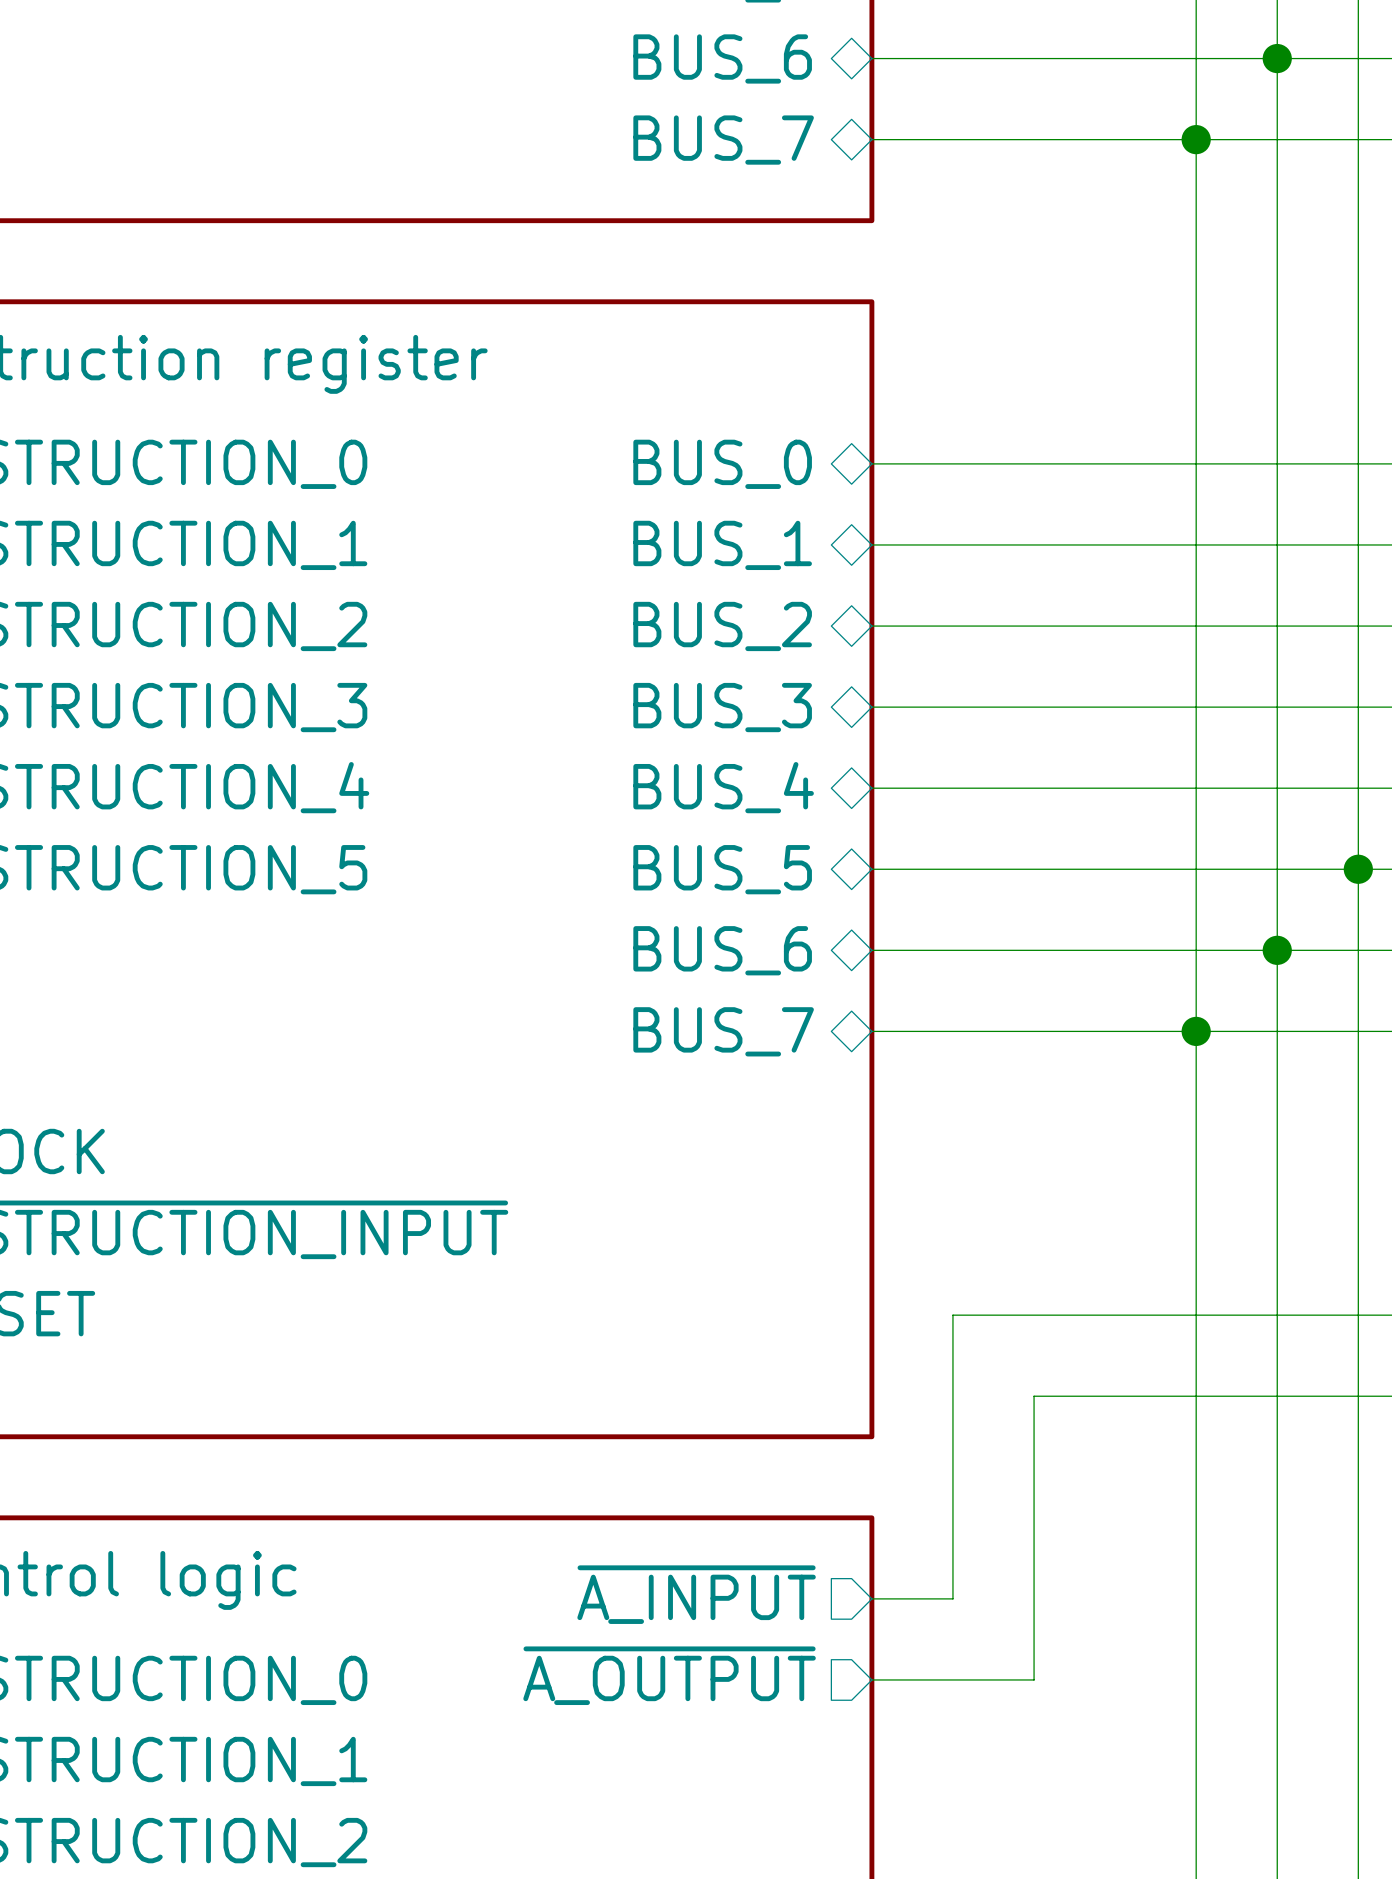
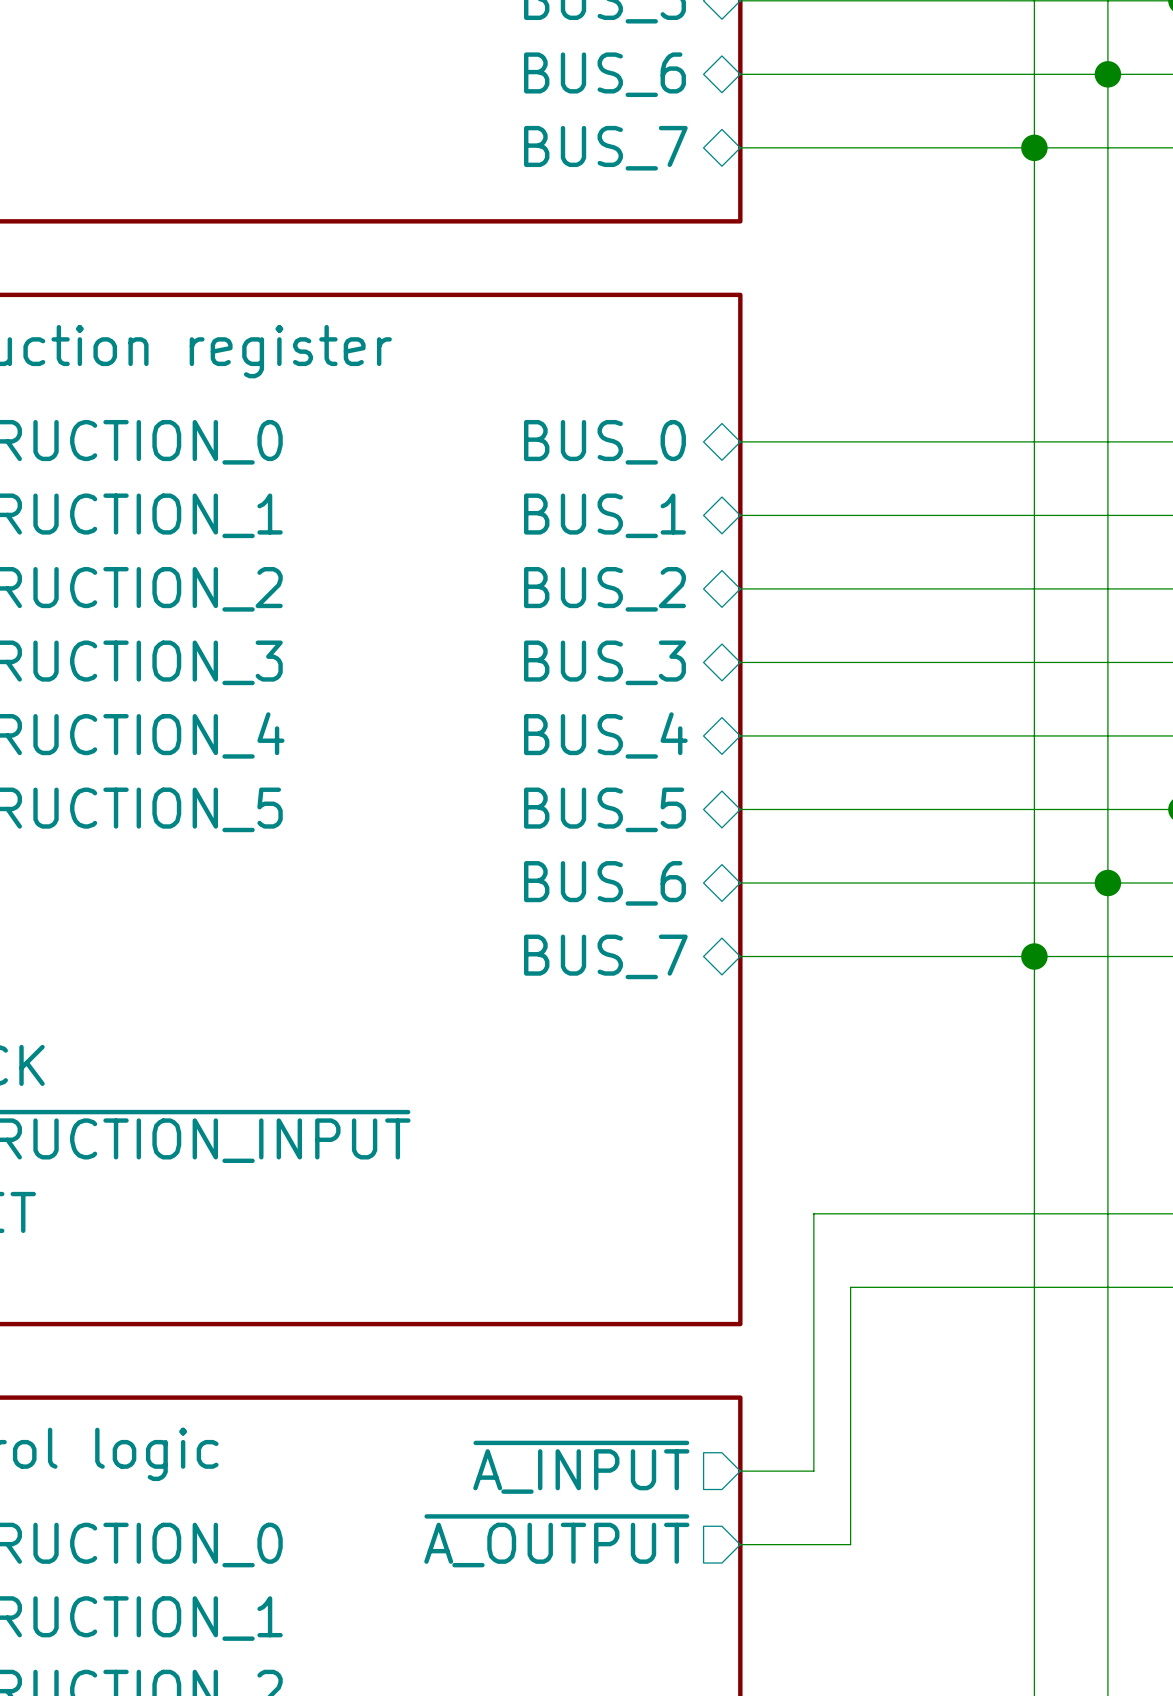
wire: (1034, 1396) (1034, 1679) (993, 1679) -> (887, 1287) (850, 1287) (850, 1544)

